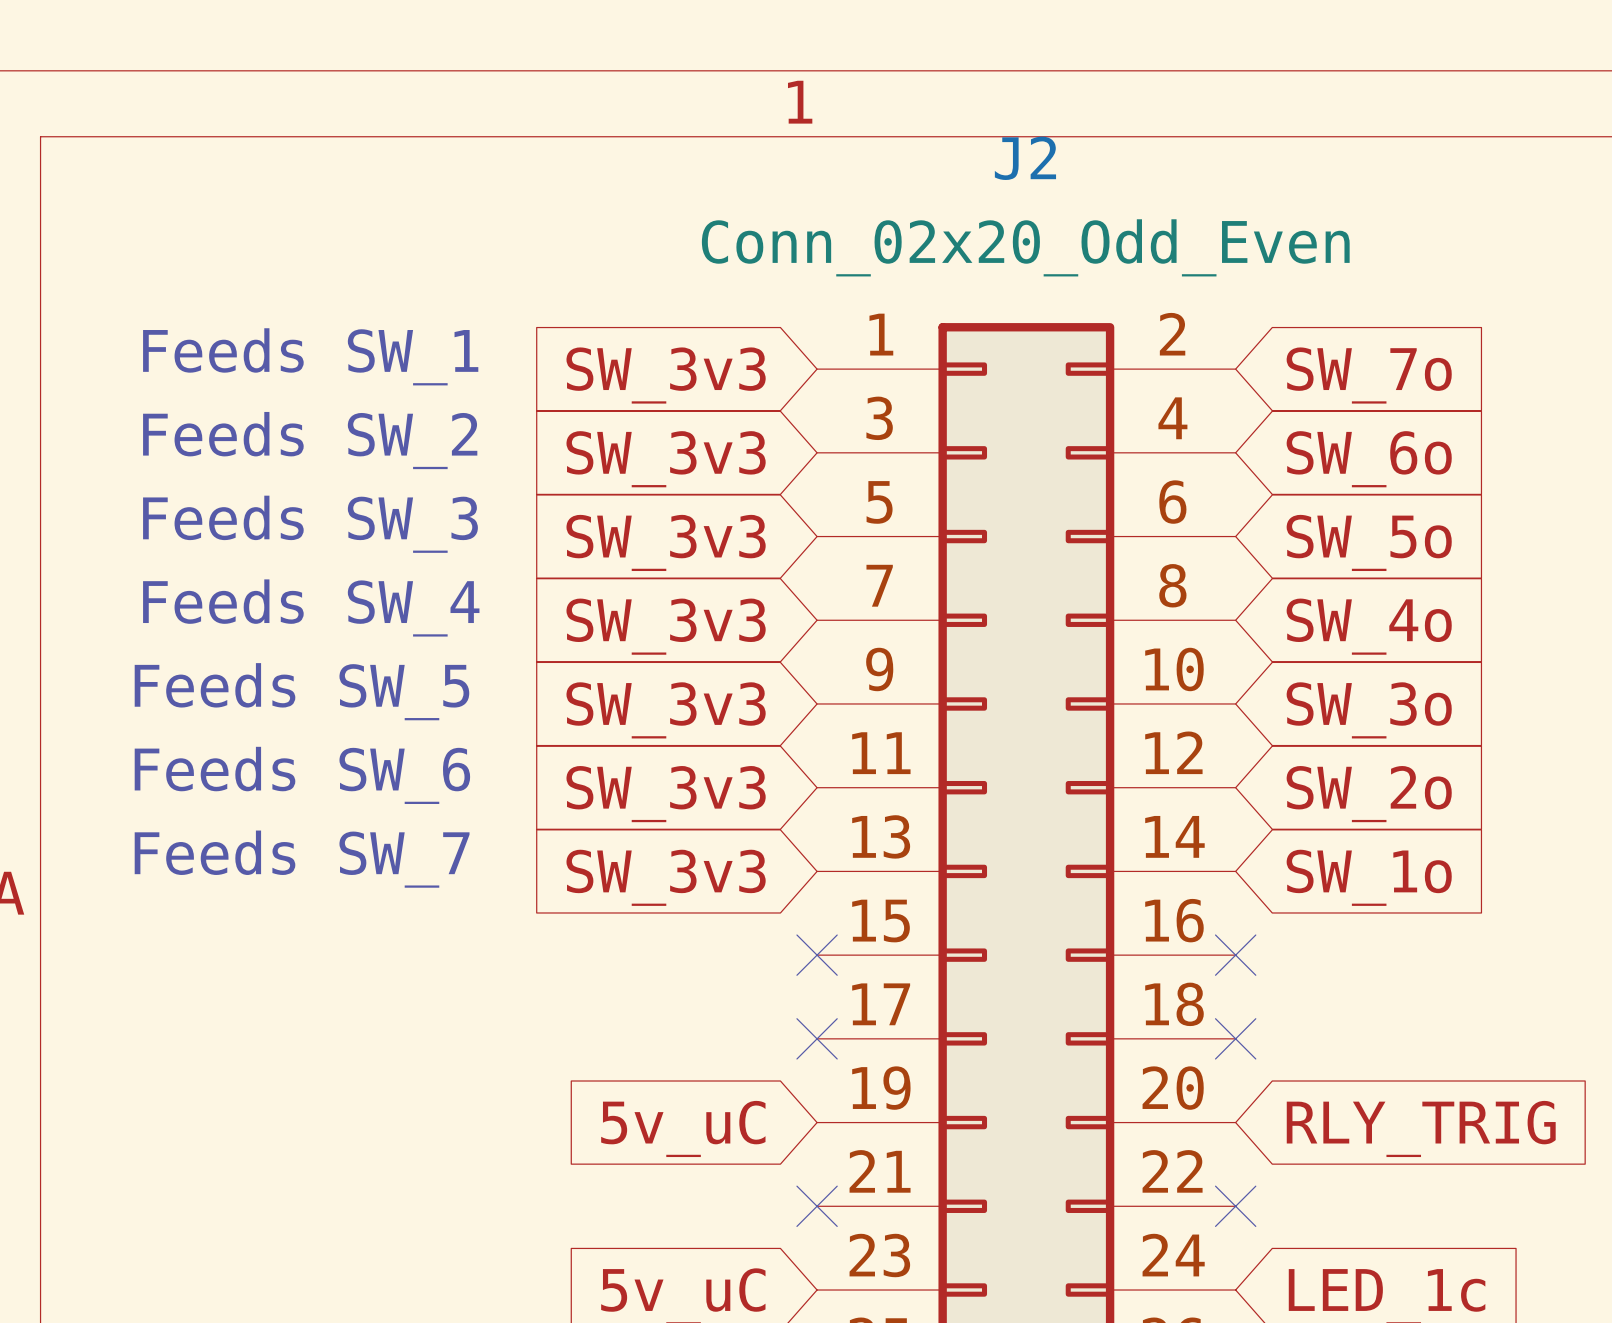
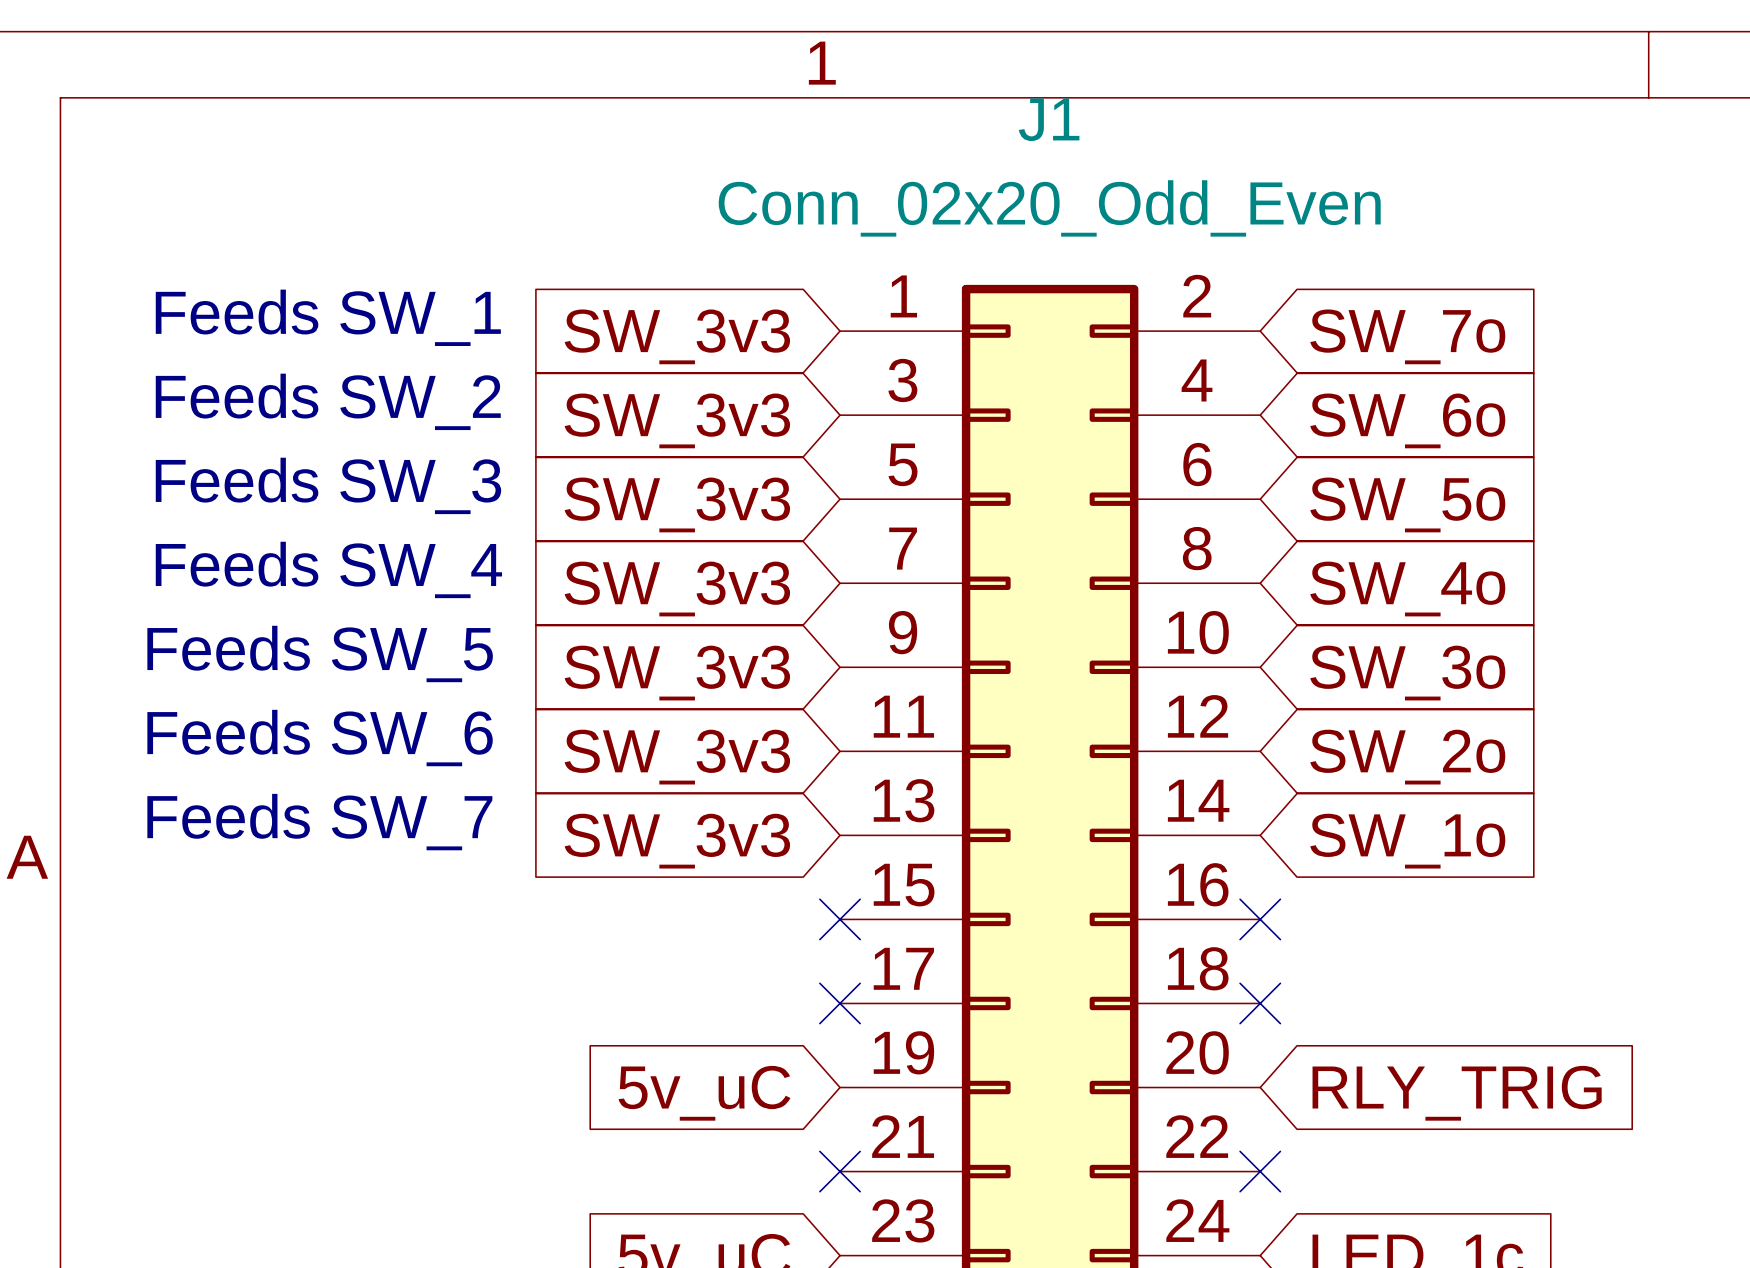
J2 name: J2 (1025, 158) -> J1 (1049, 119)

